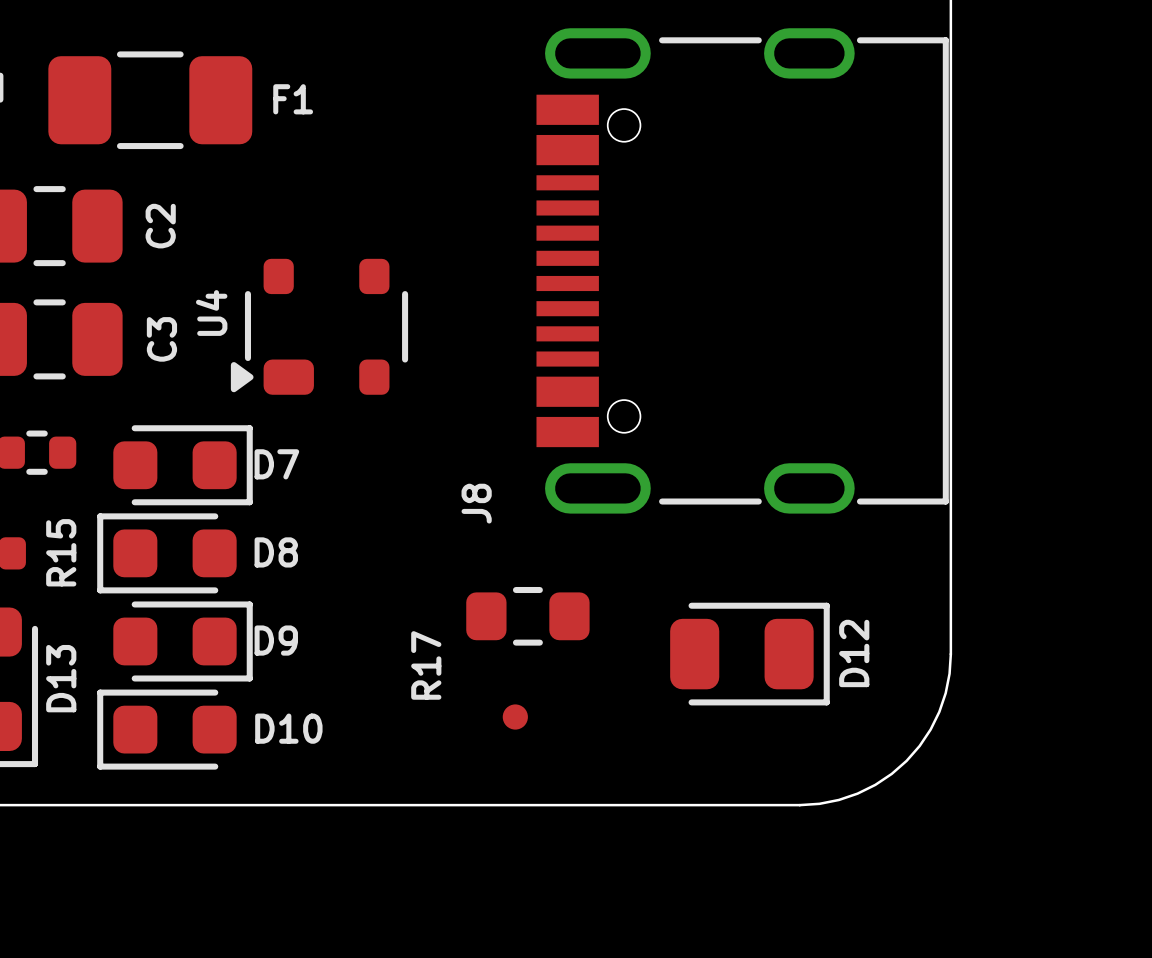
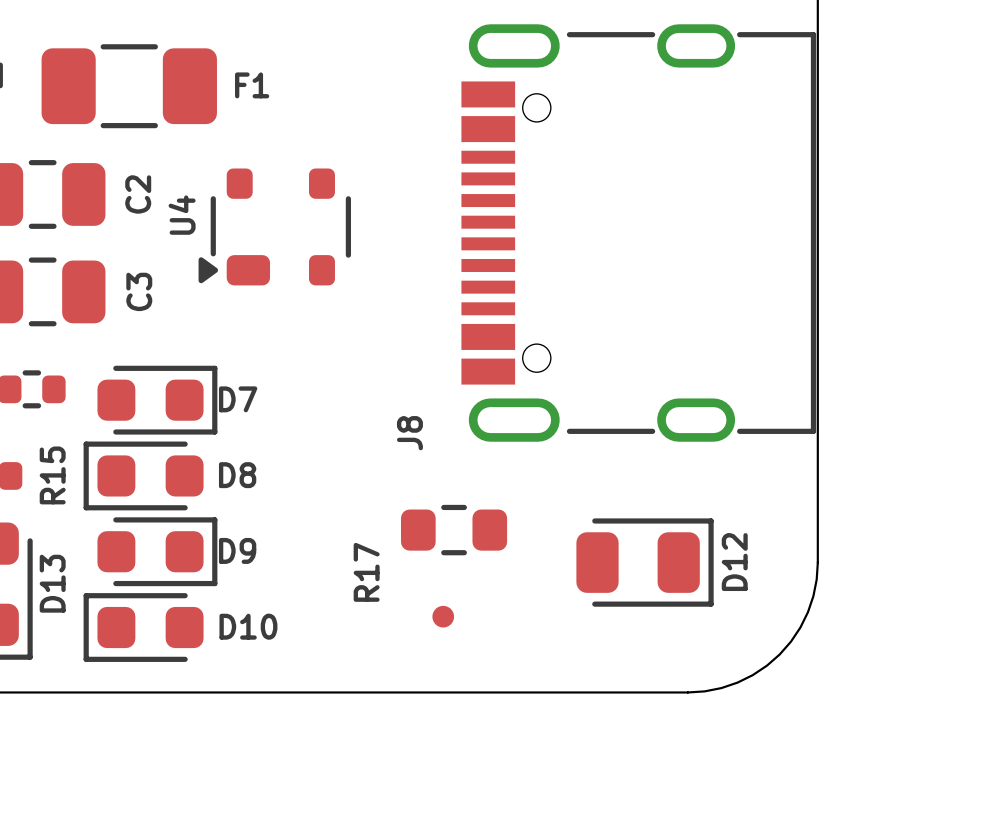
U4 position: (319, 326) -> (274, 226)

